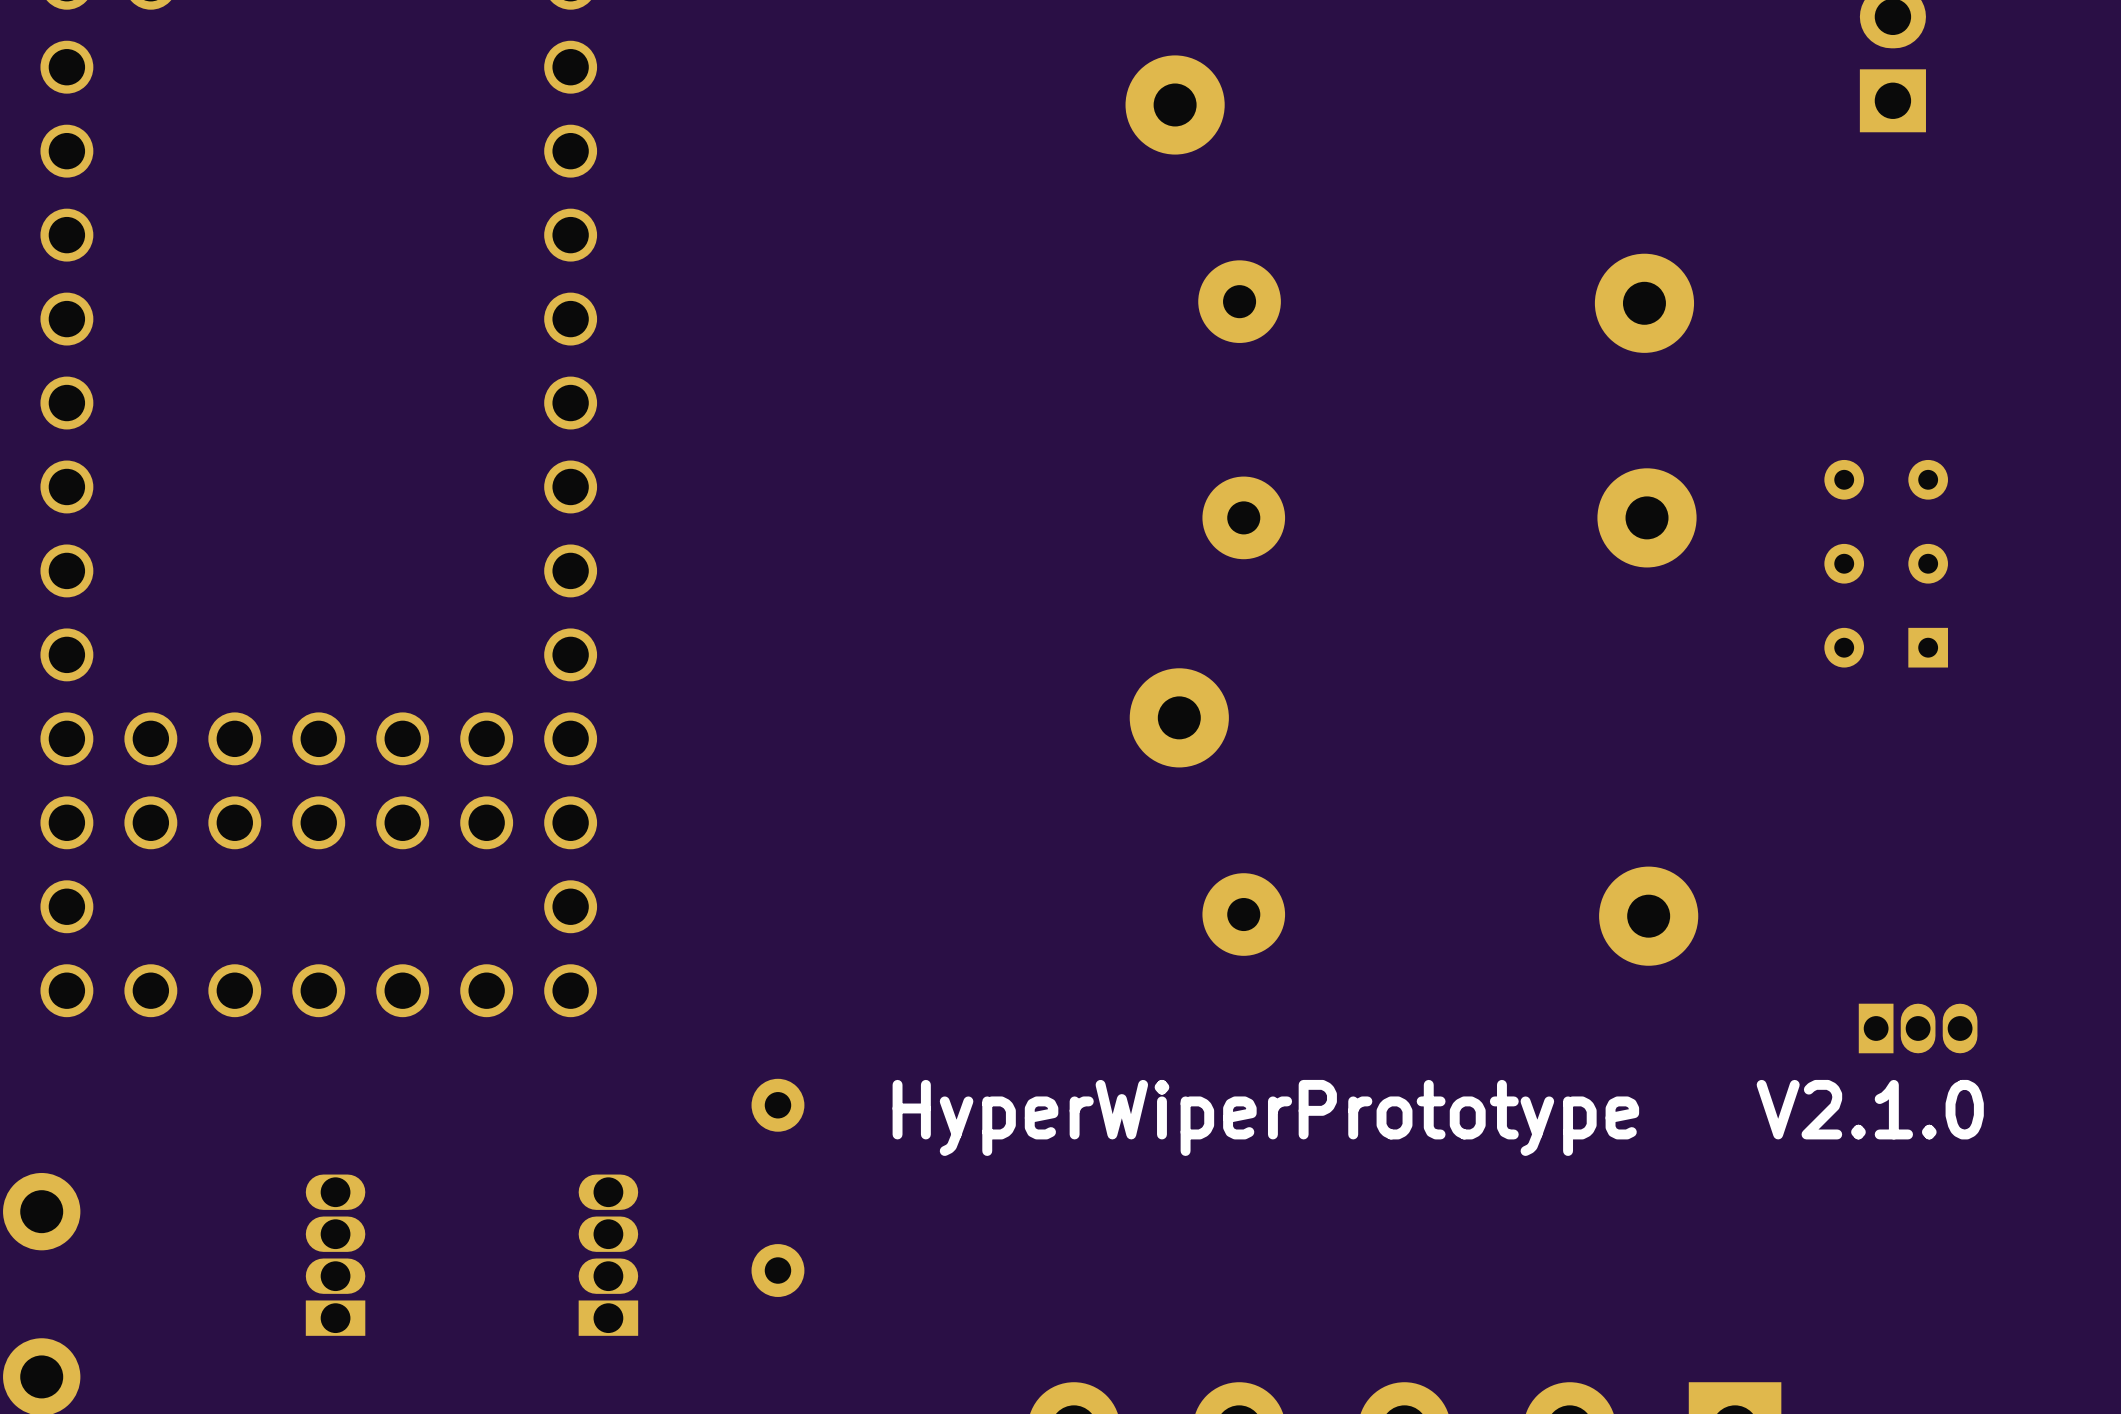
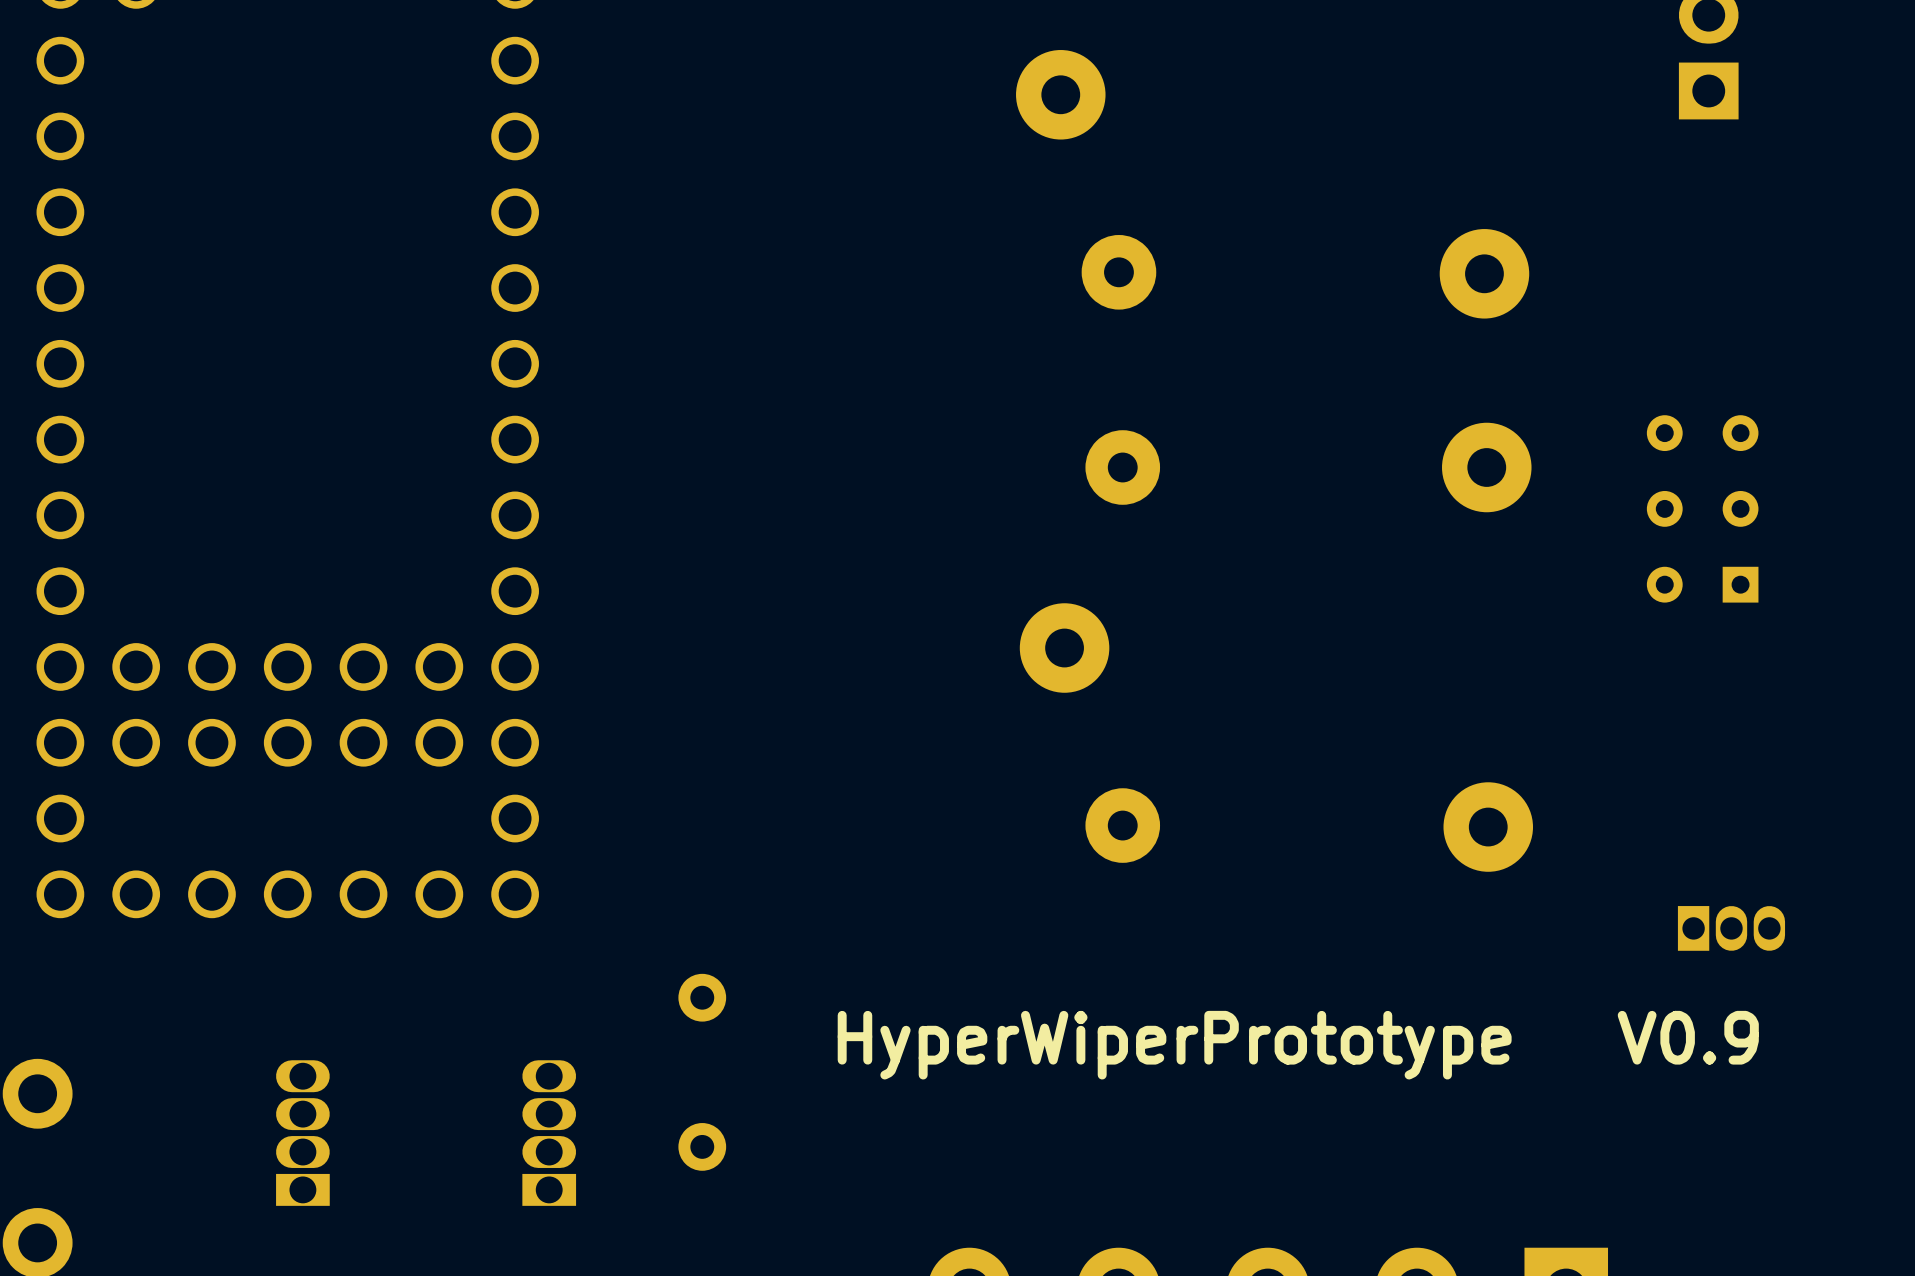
text: HyperWiperPrototype V2.1.0 (1438, 1117) -> HyperWiperPrototype V0.9 (1298, 1045)

